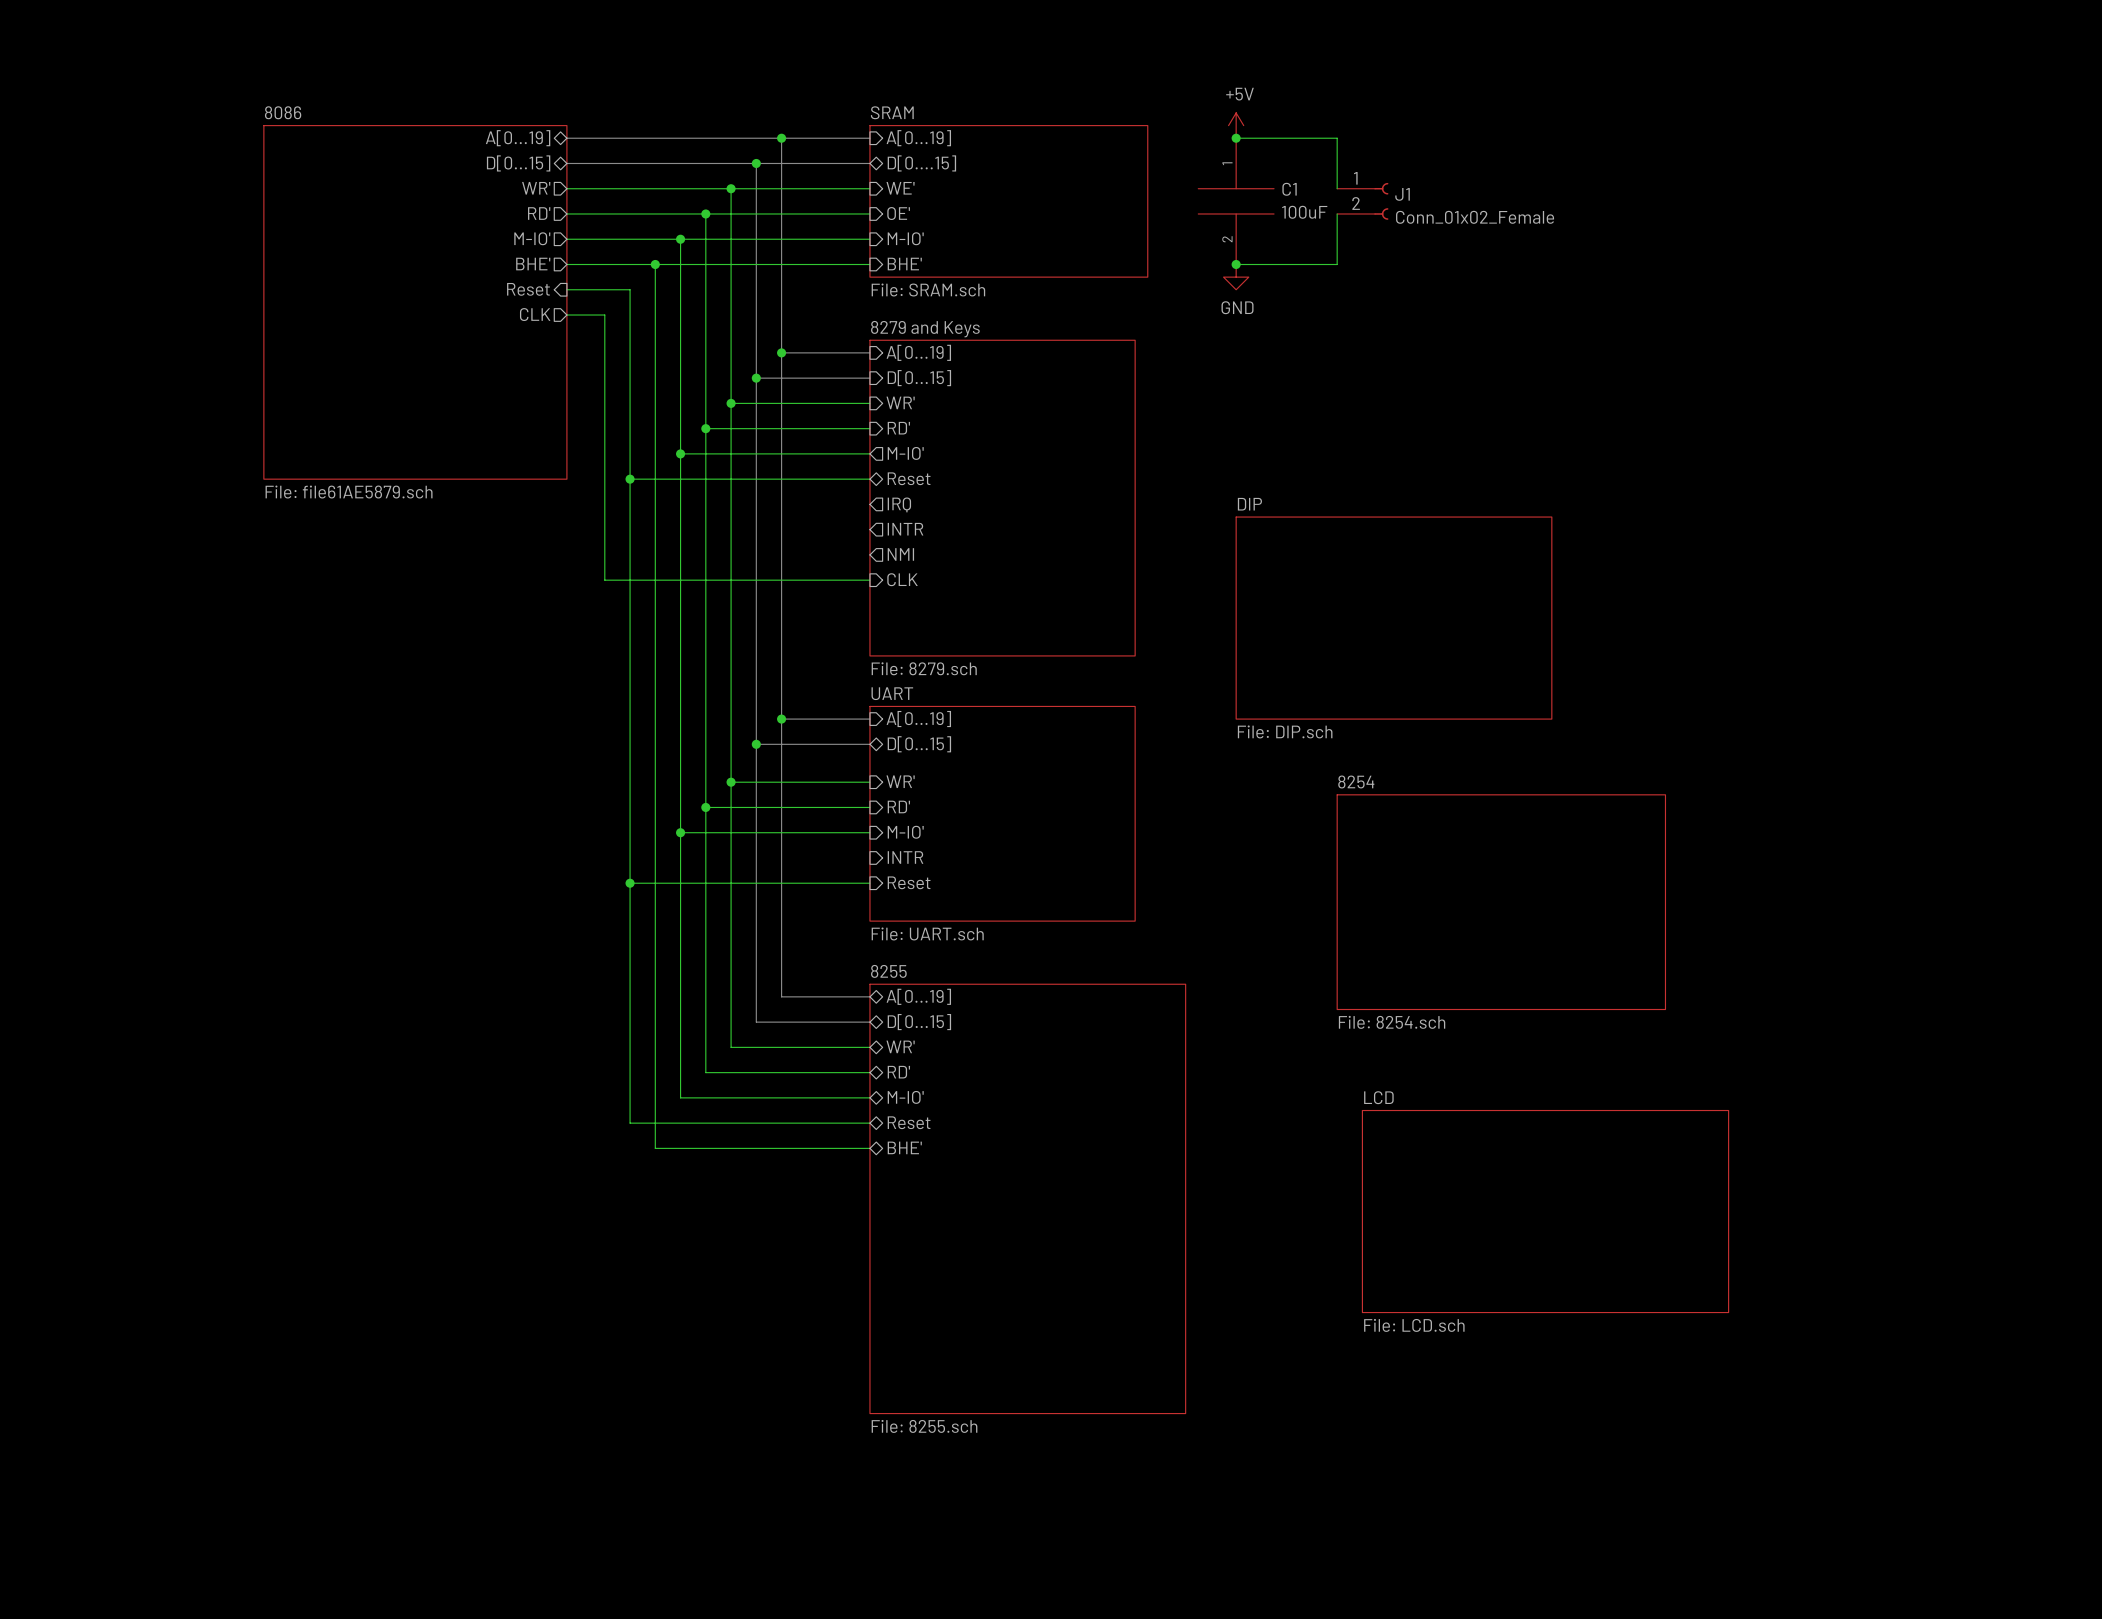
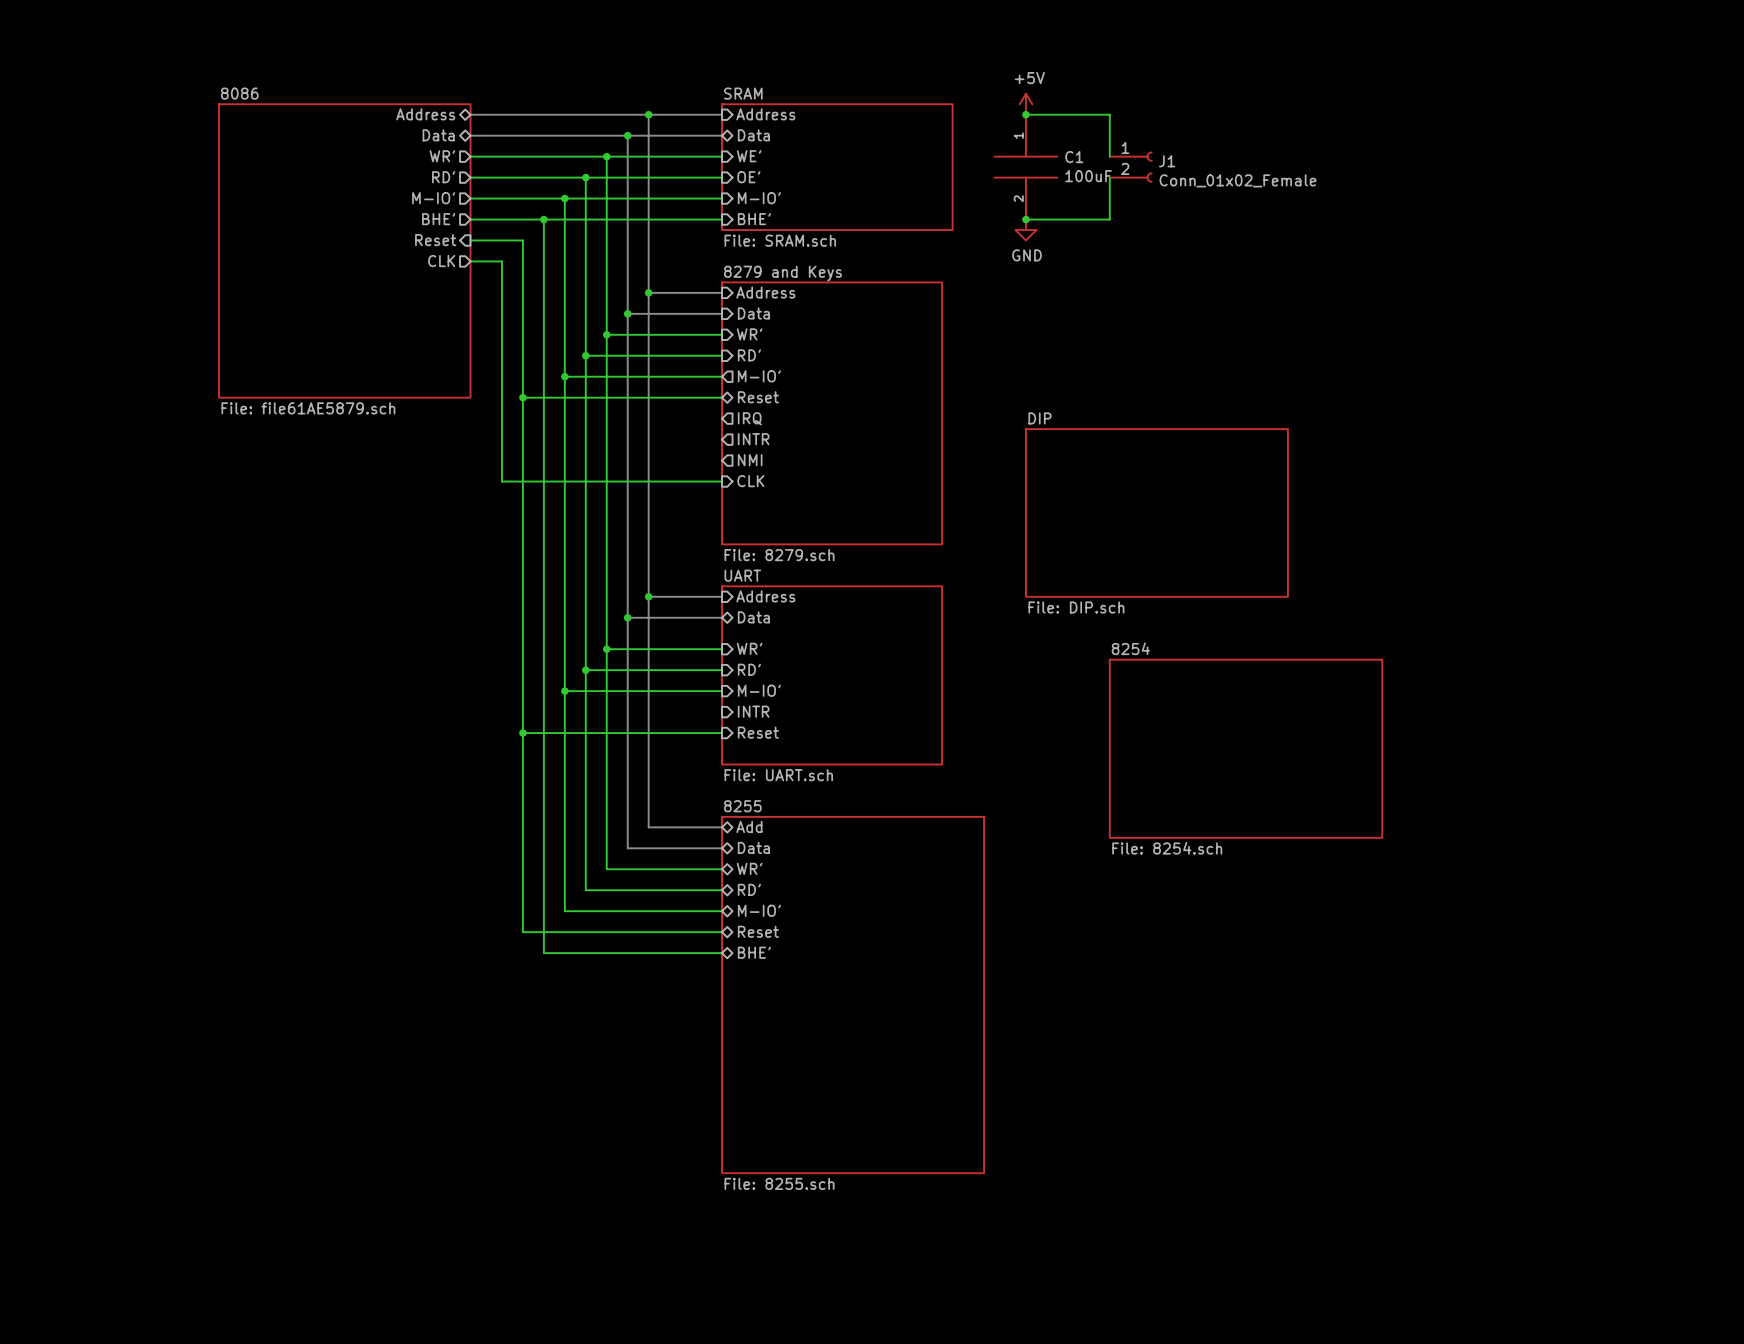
sheet pin: A[0...19] (518, 138) -> Address (425, 114)
sheet pin: A[0...19] (918, 138) -> Address (765, 114)
sheet pin: D[0...15] (518, 163) -> Data (438, 135)
sheet pin: D[0....15] (921, 163) -> Data (753, 135)
sheet pin: A[0...19] (918, 352) -> Address (765, 292)
sheet pin: D[0...15] (919, 378) -> Data (753, 313)
sheet pin: A[0...19] (918, 719) -> Address (765, 596)
sheet pin: D[0...15] (919, 744) -> Data (753, 617)
sheet pin: A[0...19] (918, 996) -> Add (749, 826)
sheet pin: D[0...15] (919, 1022) -> Data (753, 847)
sheet LCD: File: LCD.sch (1545, 1211) -> none

